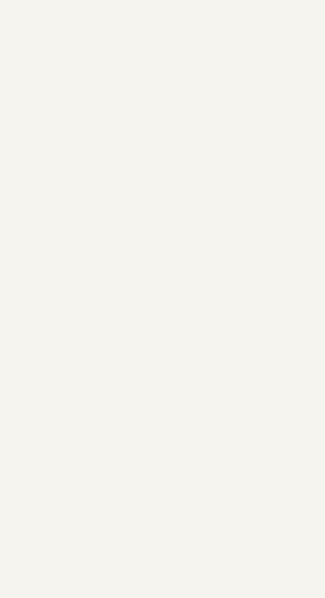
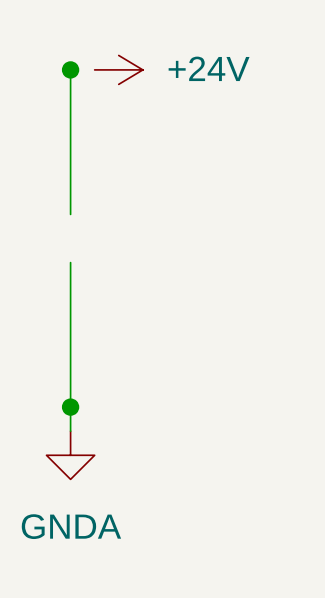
wire: none -> (70, 69) (70, 214)
junction: none -> (70, 69)
power symbol: none -> +24V (118, 69)
wire: none -> (70, 262) (70, 431)
junction: none -> (70, 407)
power symbol: none -> GNDA (70, 455)

